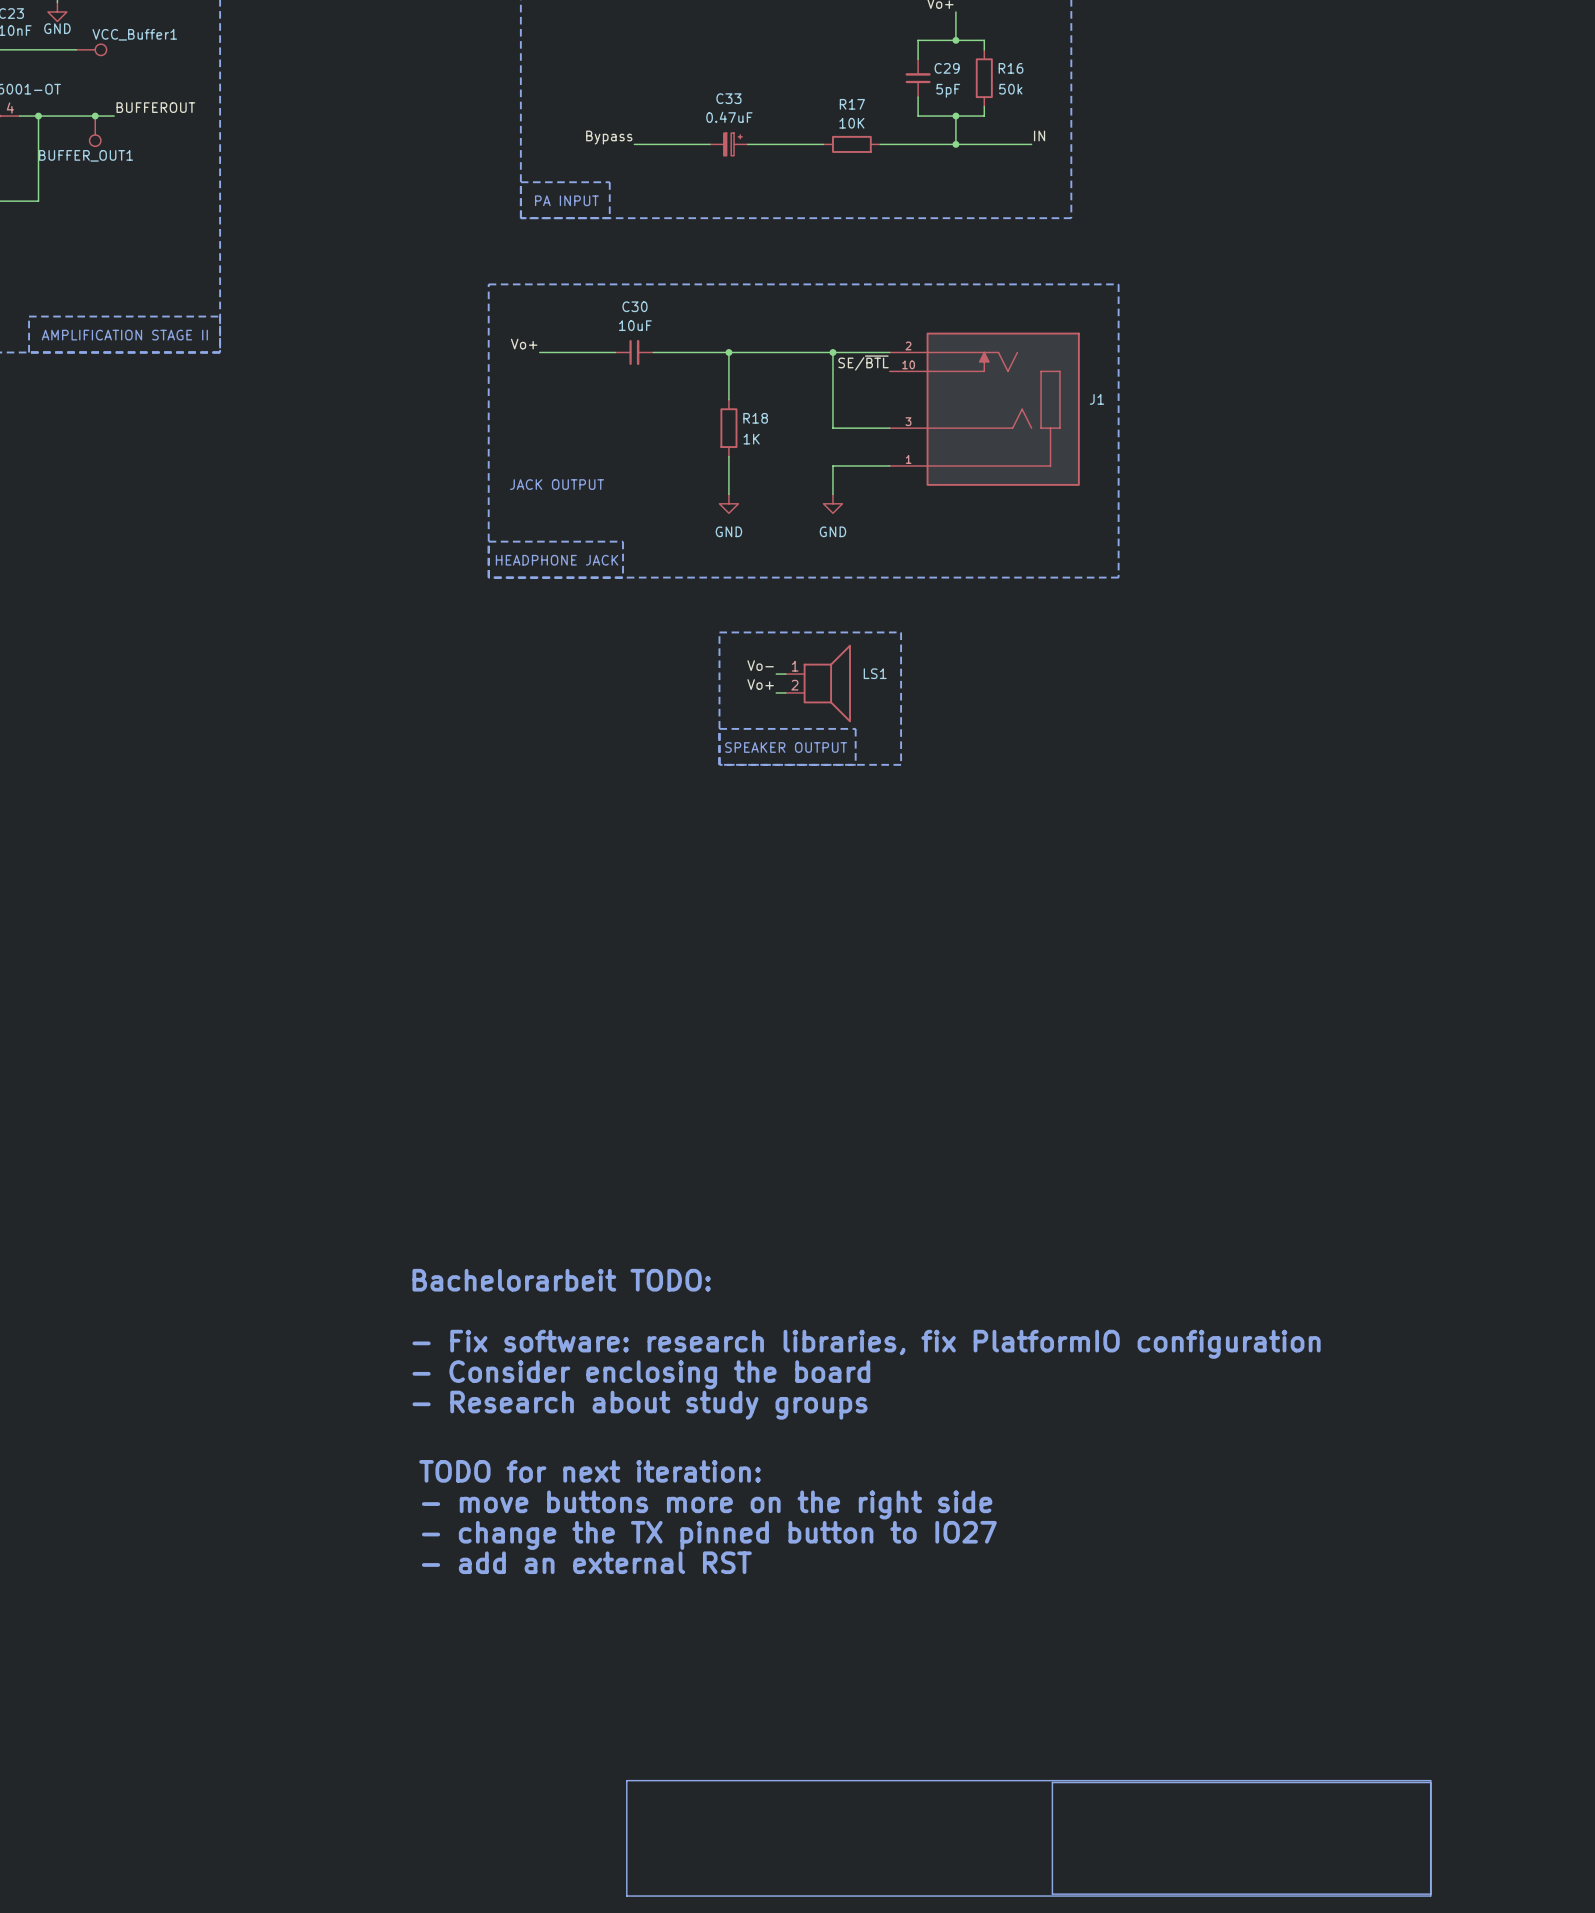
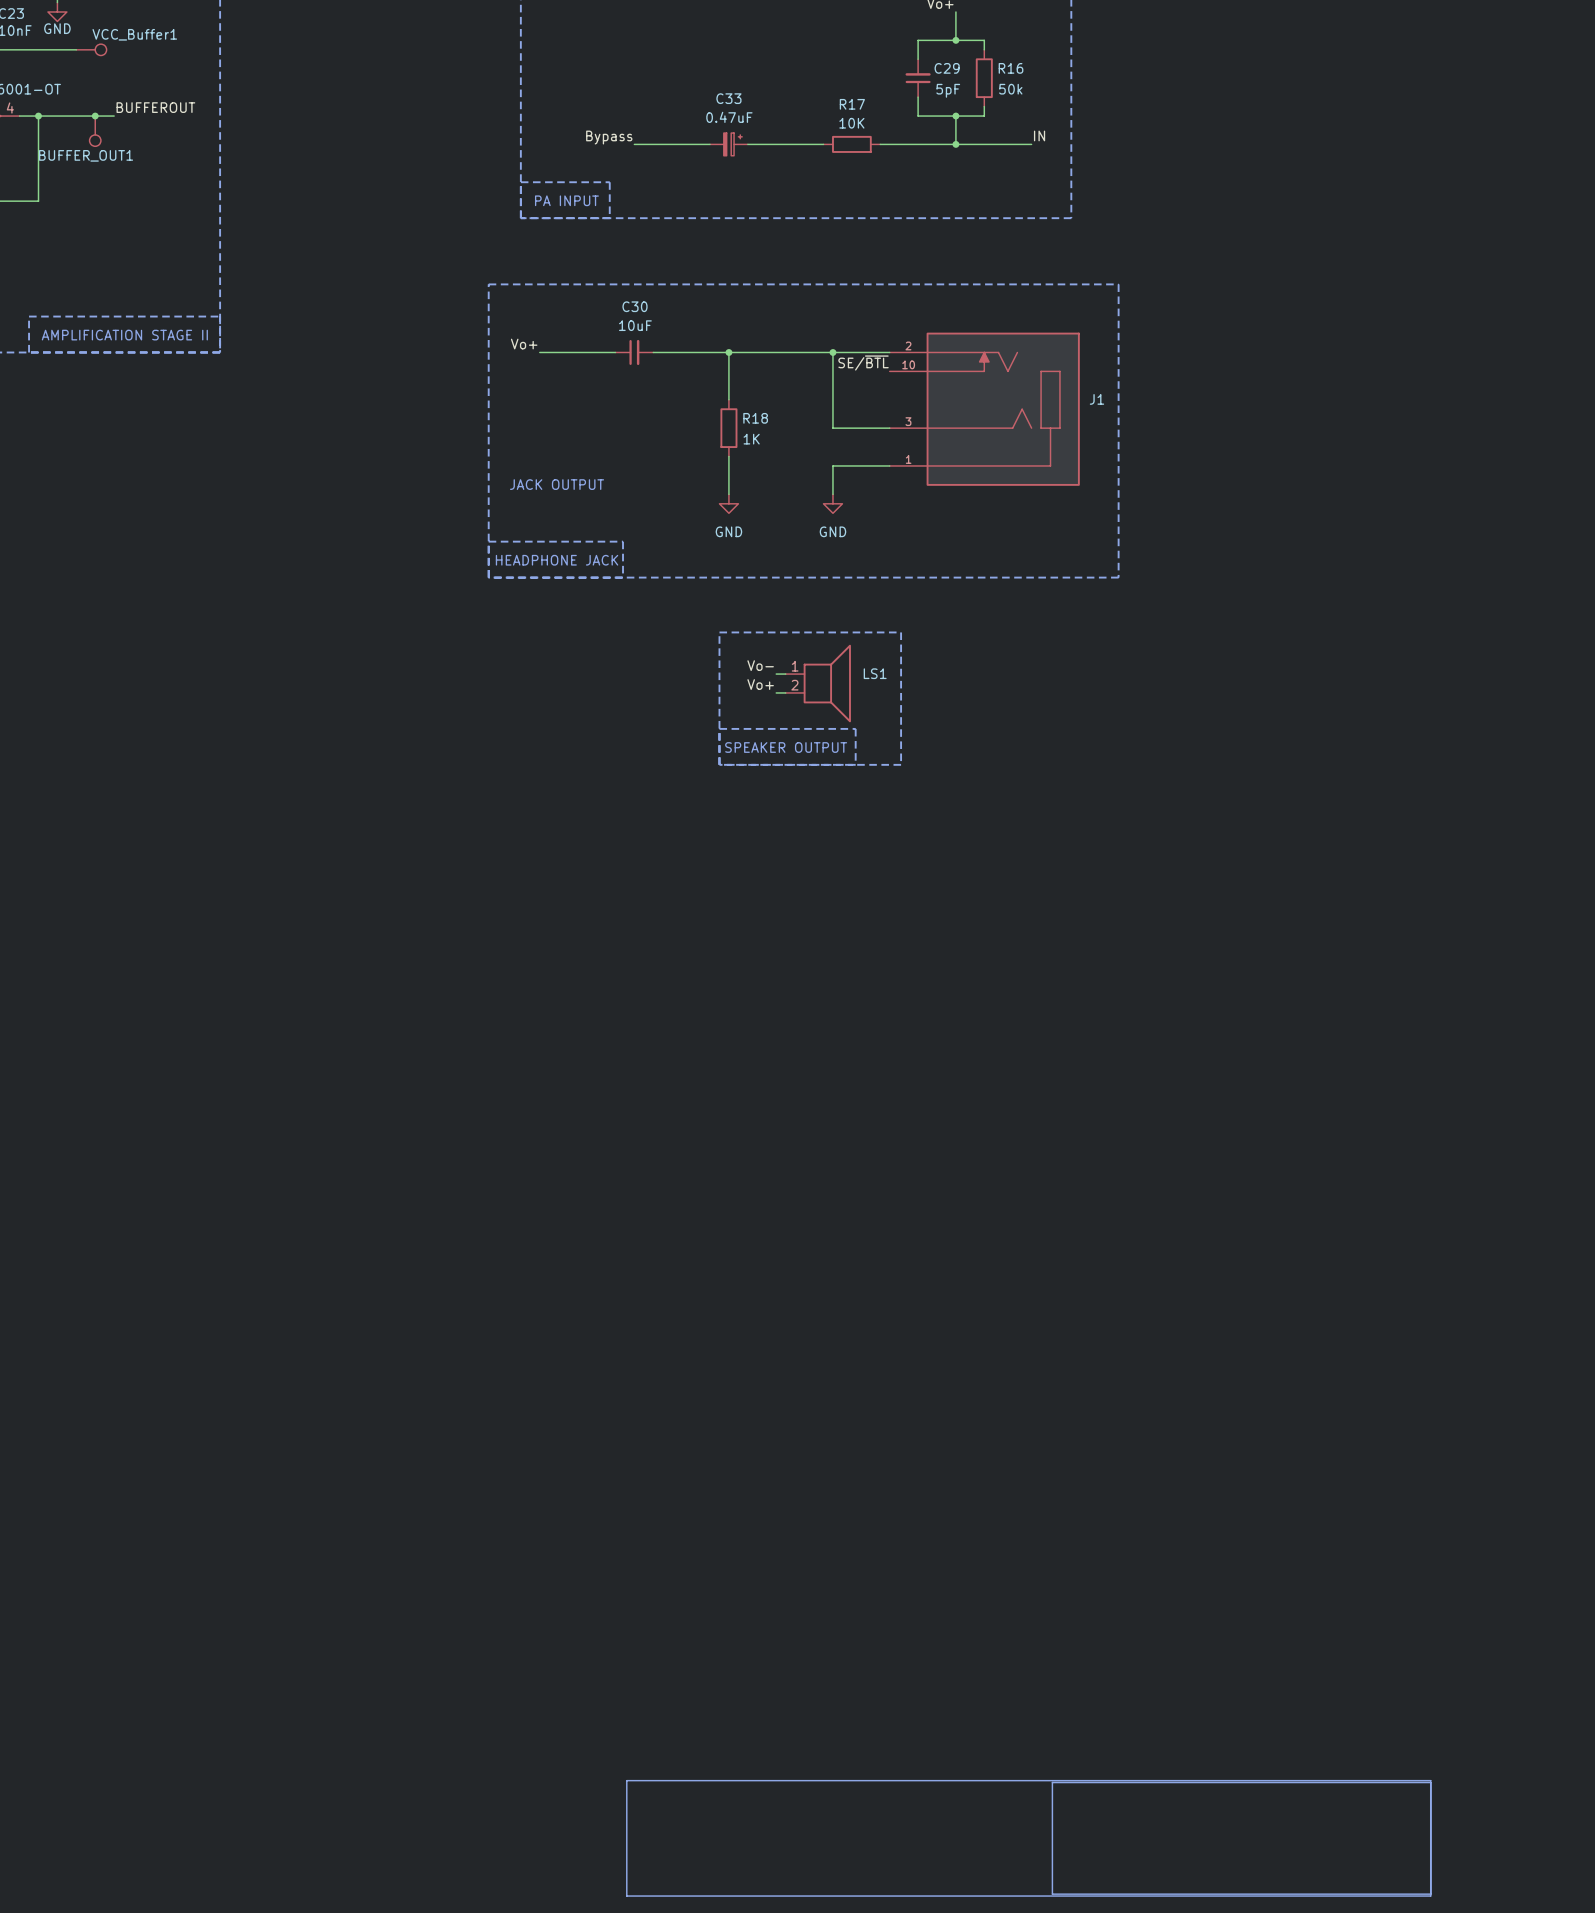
text: Bachelorarbeit TODO: (561, 1280) -> none
text: - Fix software: research libraries, fix PlatformIO configuration (866, 1344) -> none
text: - Consider enclosing the board (641, 1374) -> none
text: - Research about study groups (640, 1405) -> none
text: TODO for next iteration: (590, 1471) -> none
text: - move buttons more on the right side (707, 1504) -> none
text: - change the TX pinned button to IO27 (709, 1535) -> none
text: - add an external RST (586, 1562) -> none

